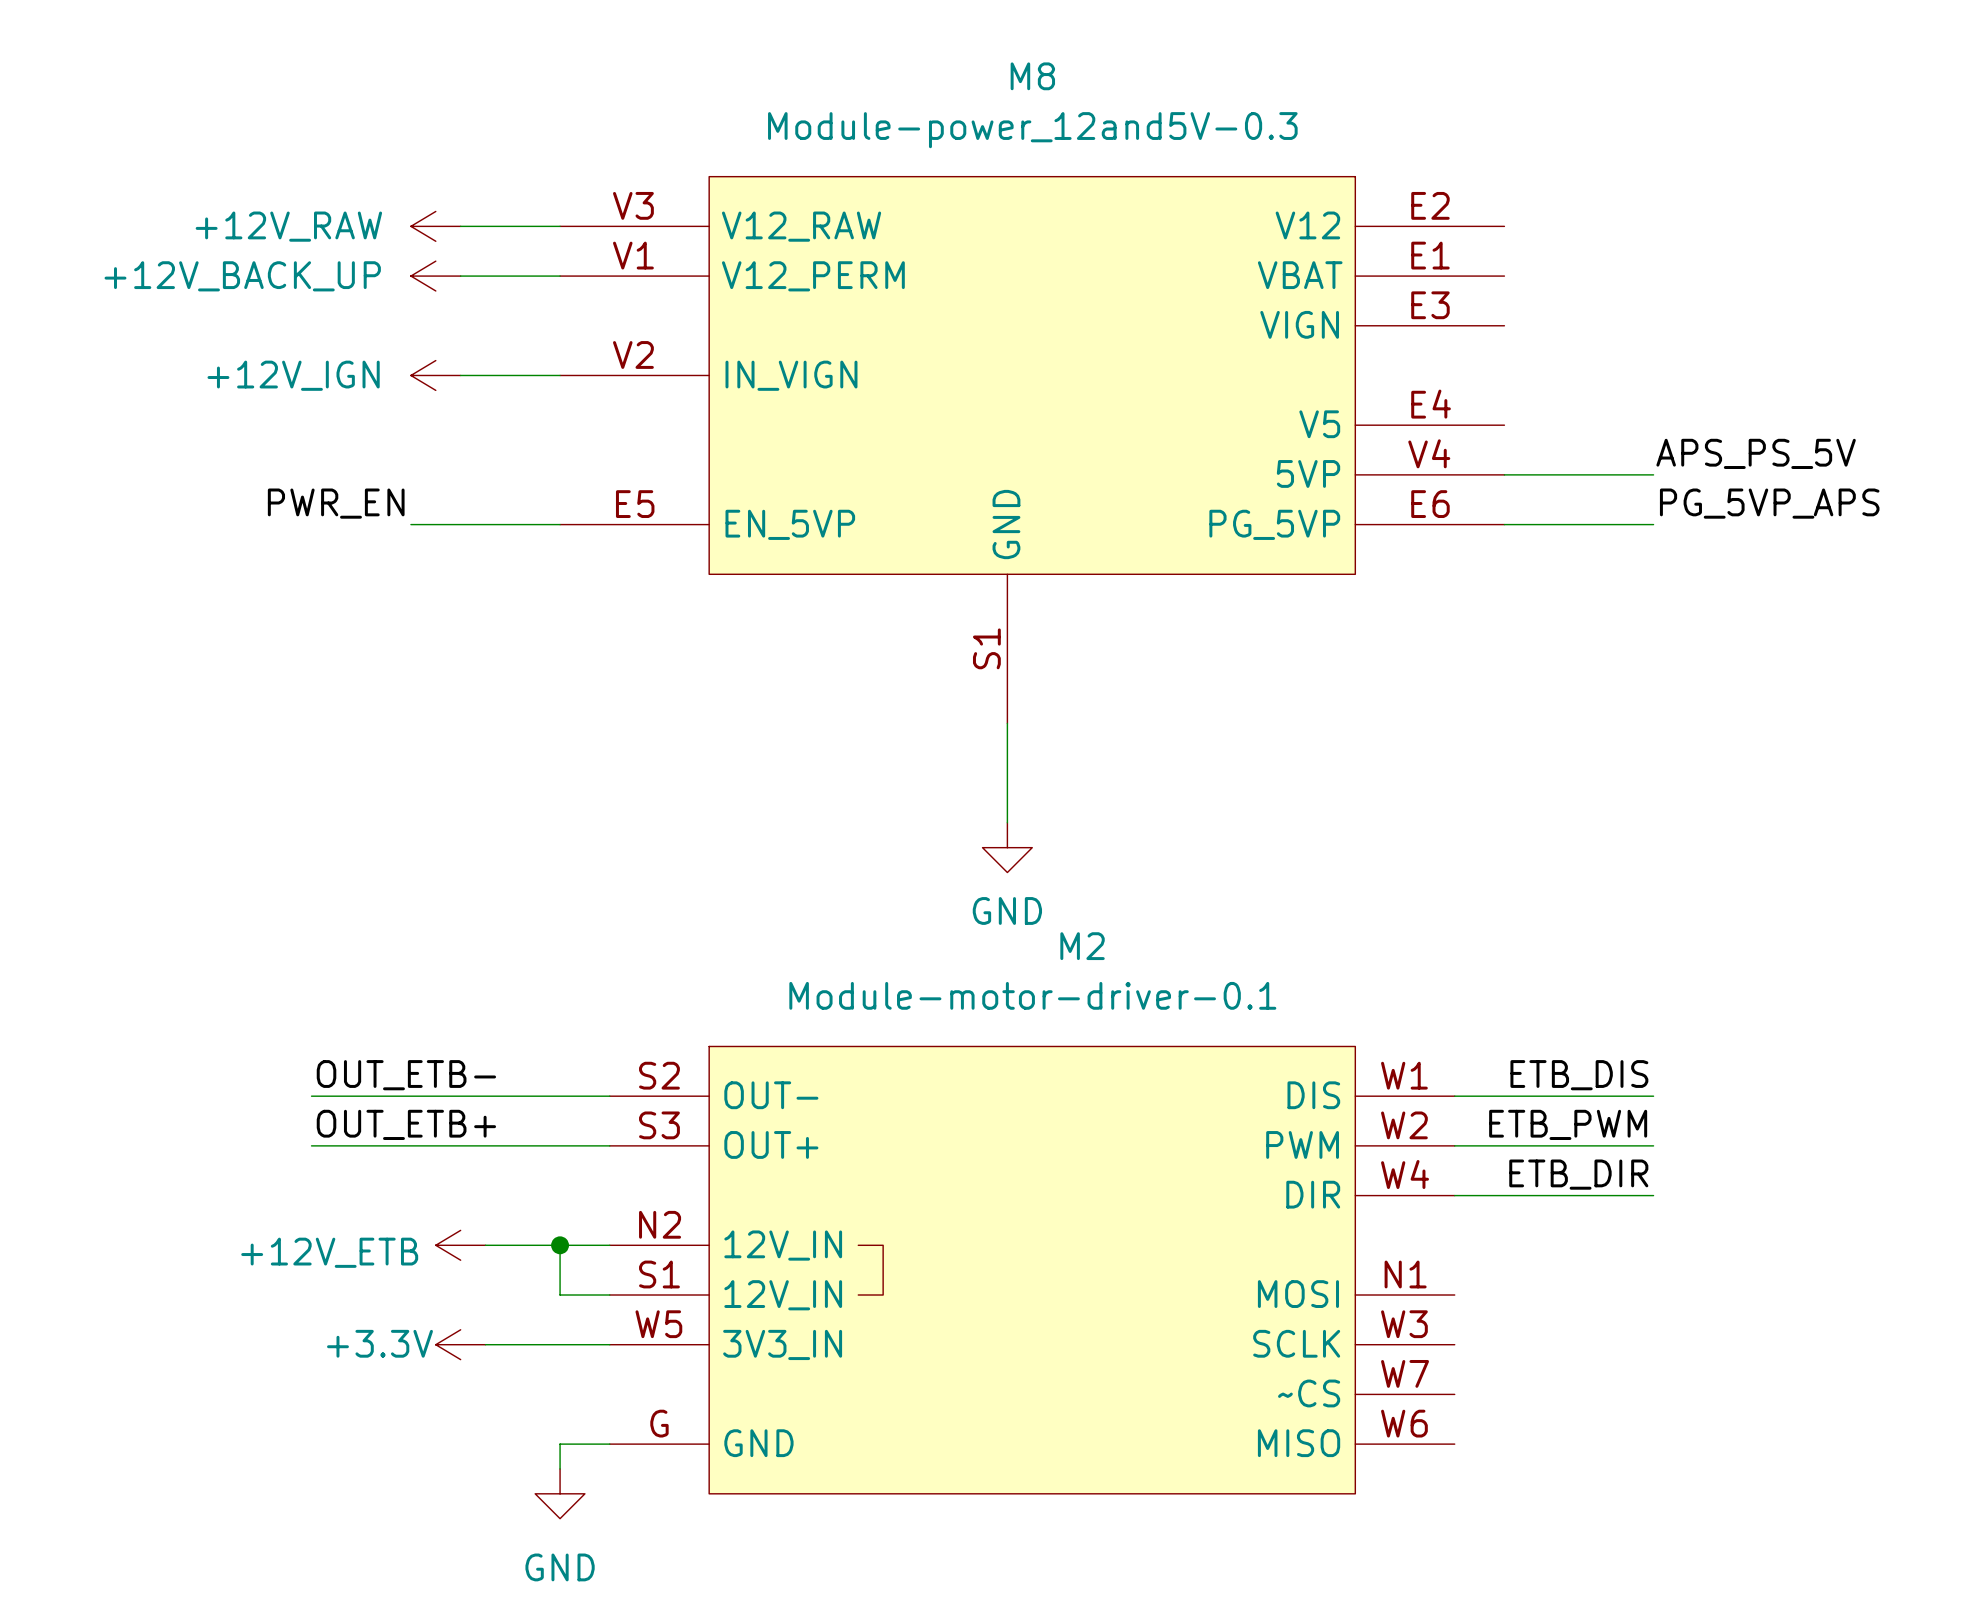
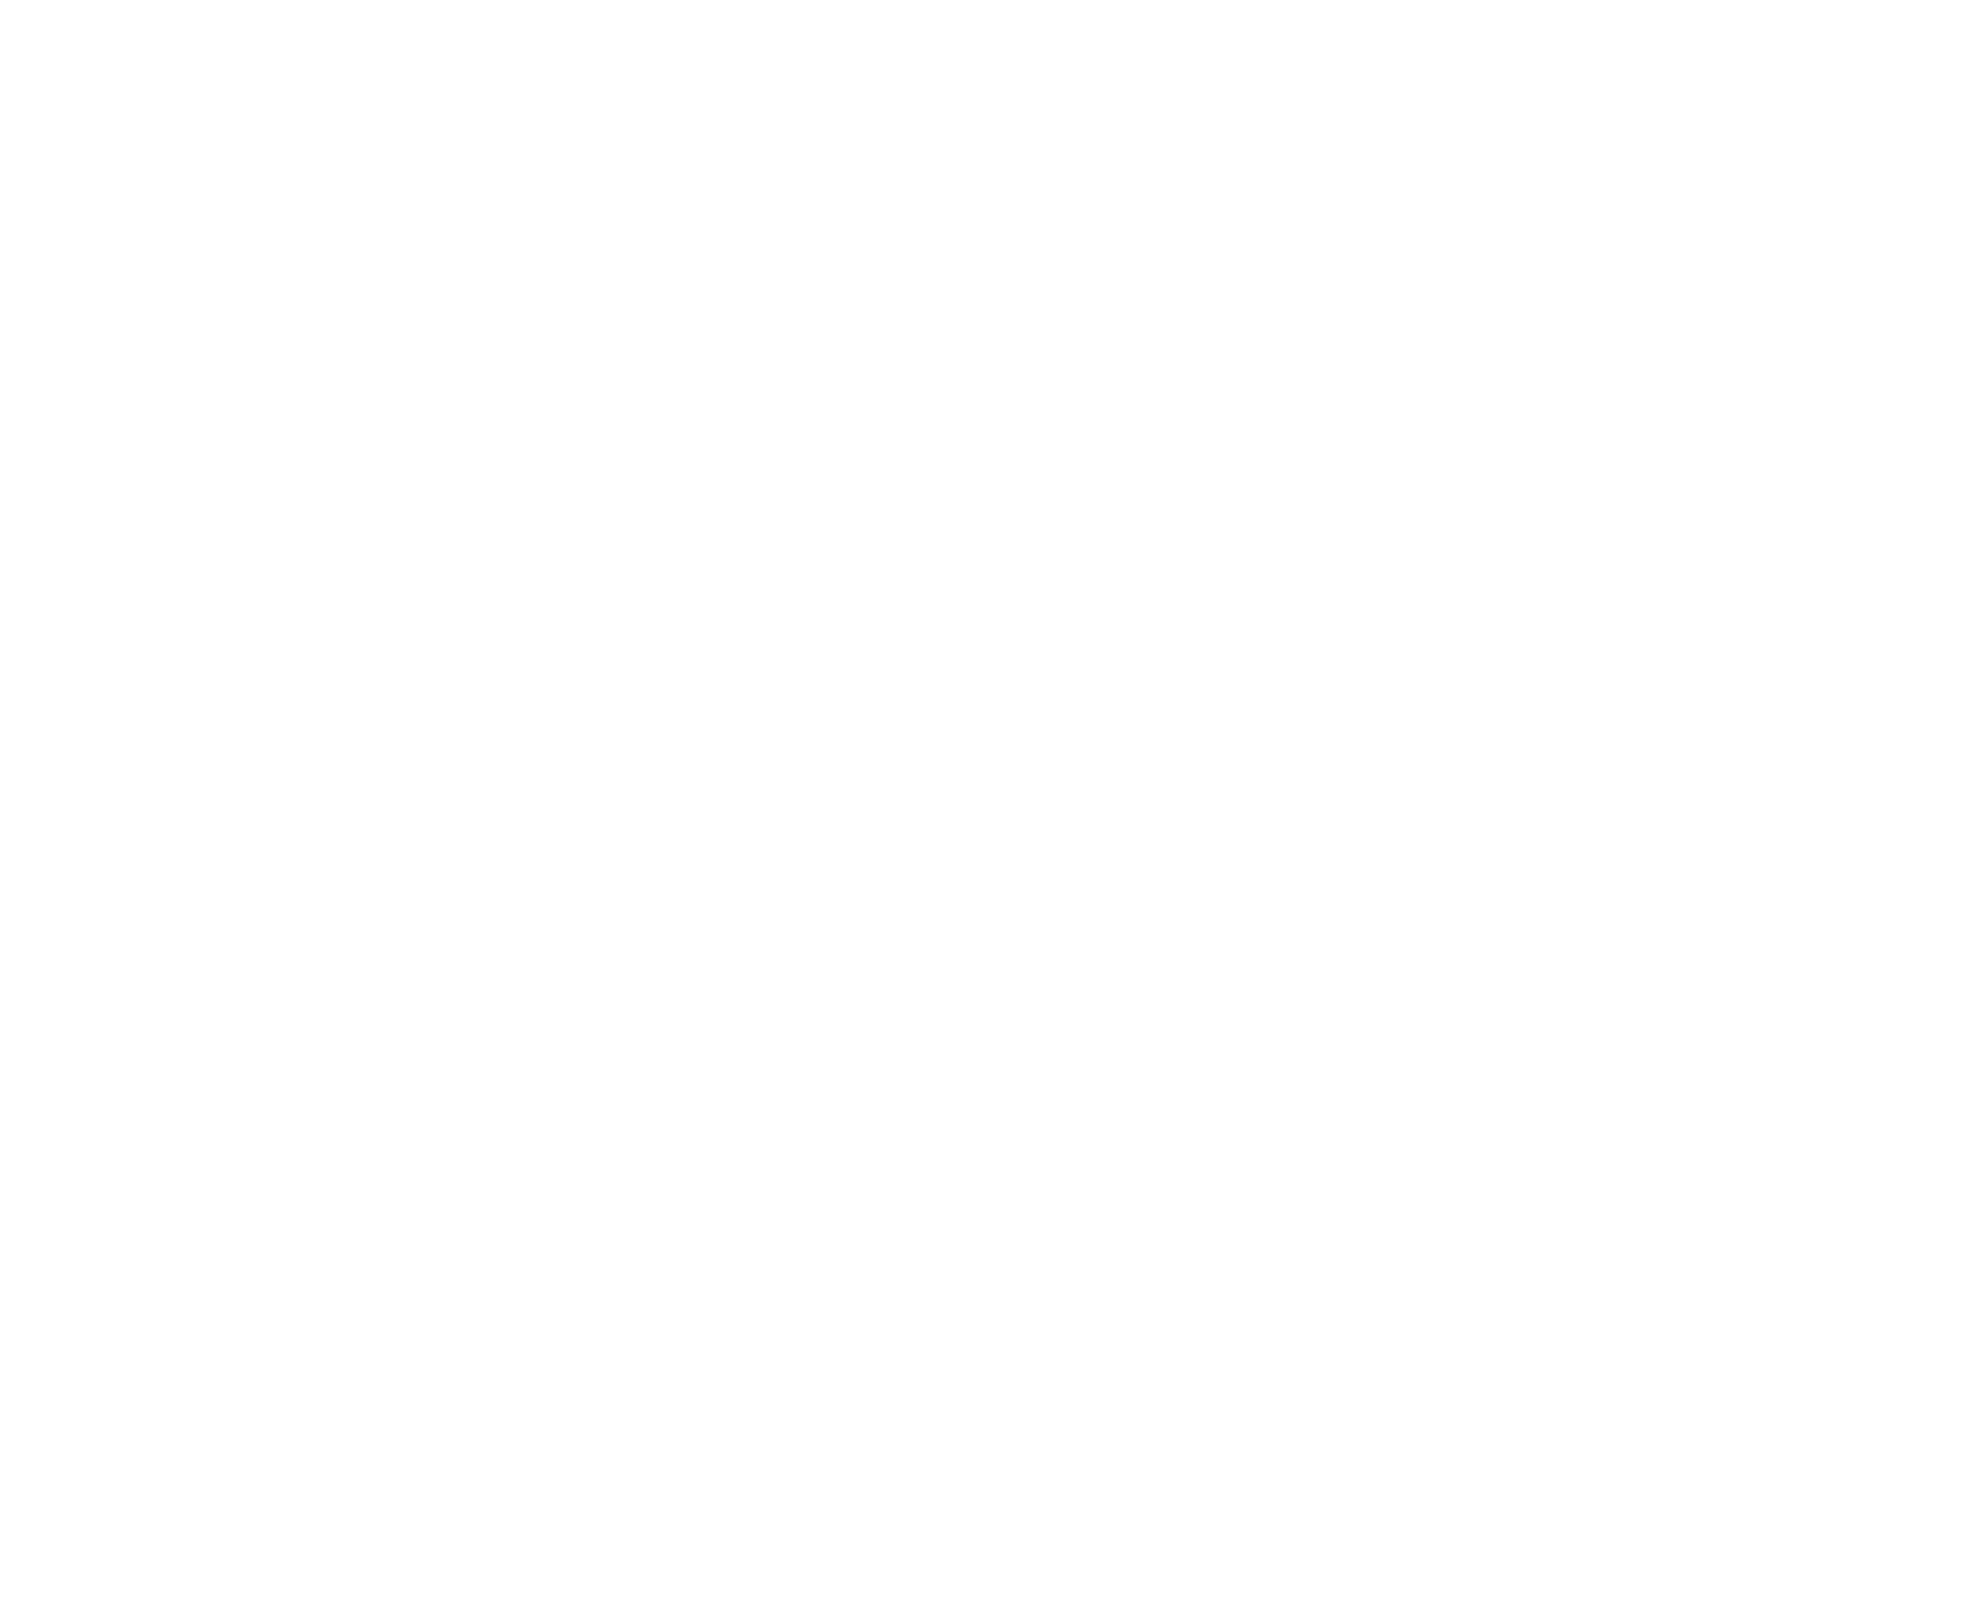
power symbol: +12V_RAW (435, 226) -> none
wire: (460, 226) (560, 226) -> none
power symbol: +12V_BACK_UP (435, 276) -> none
wire: (460, 276) (560, 276) -> none
power symbol: +12V_IGN (435, 375) -> none
wire: (460, 375) (560, 375) -> none
M8: Module-power_12and5V-0.3 (1032, 450) -> none
label: APS_PS_5V (1756, 453) -> none
wire: (1504, 474) (1653, 474) -> none
label: PWR_EN (336, 503) -> none
label: PG_5VP_APS (1769, 503) -> none
wire: (410, 524) (560, 524) -> none
wire: (1504, 524) (1653, 524) -> none
wire: (1007, 723) (1007, 822) -> none
power symbol: GND (1007, 847) -> none
label: OUT_ETB- (406, 1075) -> none
label: ETB_DIS (1579, 1075) -> none
wire: (311, 1096) (609, 1096) -> none
wire: (1454, 1096) (1653, 1096) -> none
label: OUT_ETB+ (406, 1124) -> none
label: ETB_PWM (1568, 1124) -> none
wire: (311, 1145) (609, 1145) -> none
wire: (1454, 1145) (1653, 1145) -> none
label: ETB_DIR (1578, 1174) -> none
wire: (1454, 1195) (1653, 1195) -> none
power symbol: +12V_ETB (460, 1245) -> none
wire: (485, 1245) (609, 1245) -> none
wire: (560, 1245) (560, 1295) (609, 1295) -> none
junction: (560, 1245) -> none
M2: Module-motor-driver-0.1 (1032, 1270) -> none
power symbol: +3.3V (460, 1344) -> none
wire: (485, 1344) (609, 1344) -> none
wire: (609, 1444) (560, 1444) (560, 1468) -> none
power symbol: GND (560, 1493) -> none

